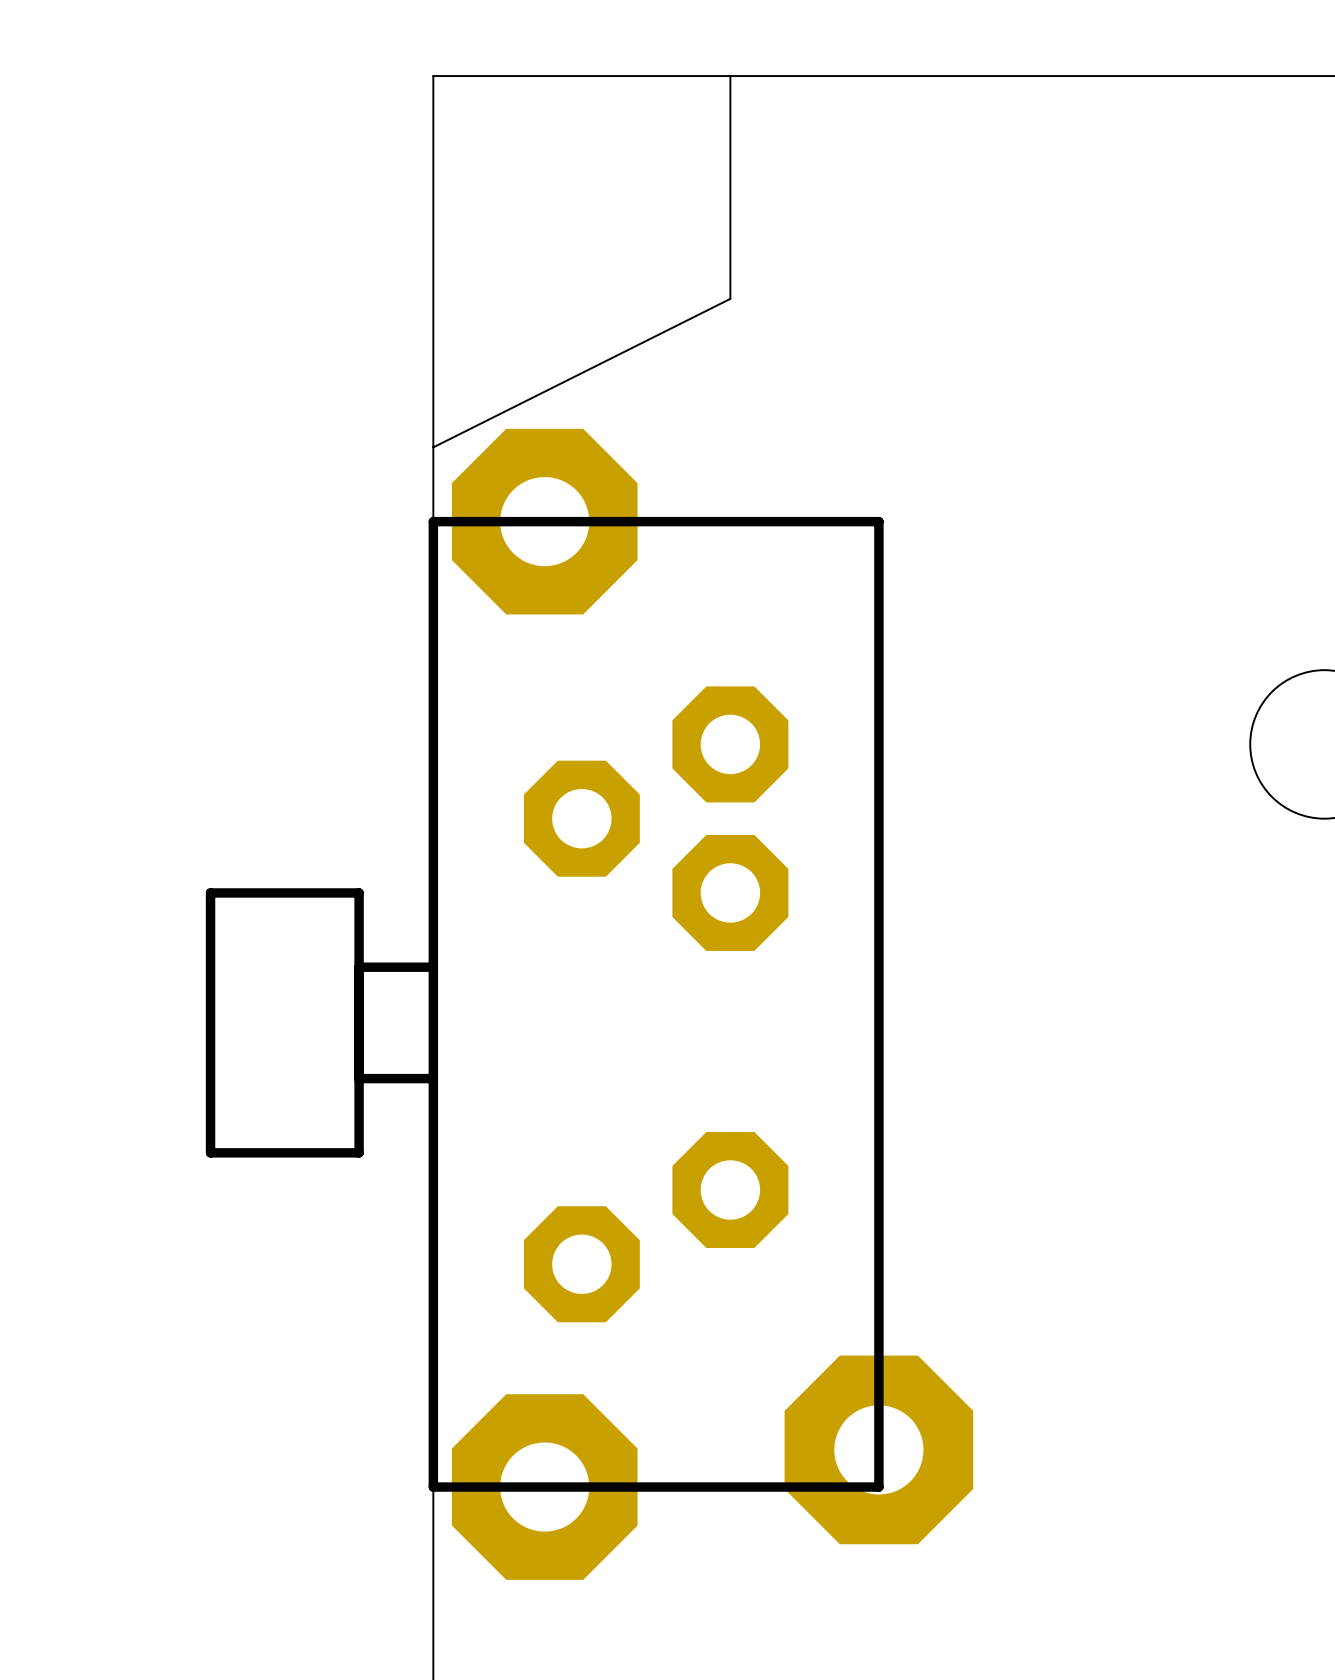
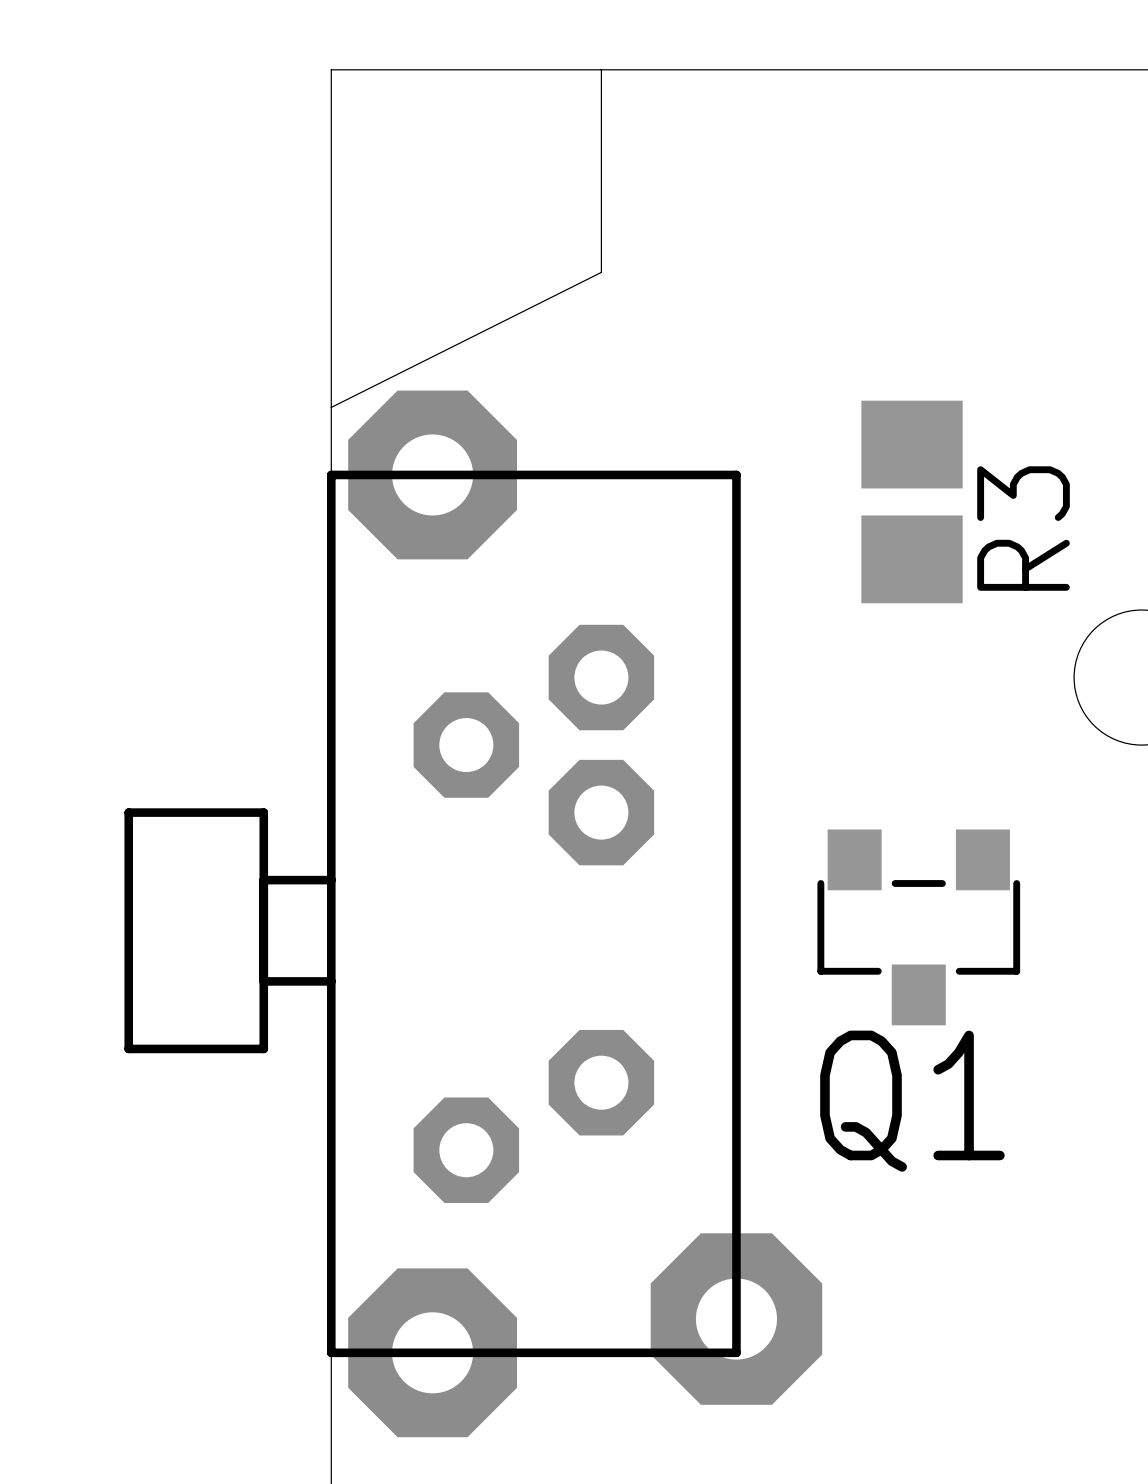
R3: none -> (912, 501)
Q1: none -> (918, 927)

